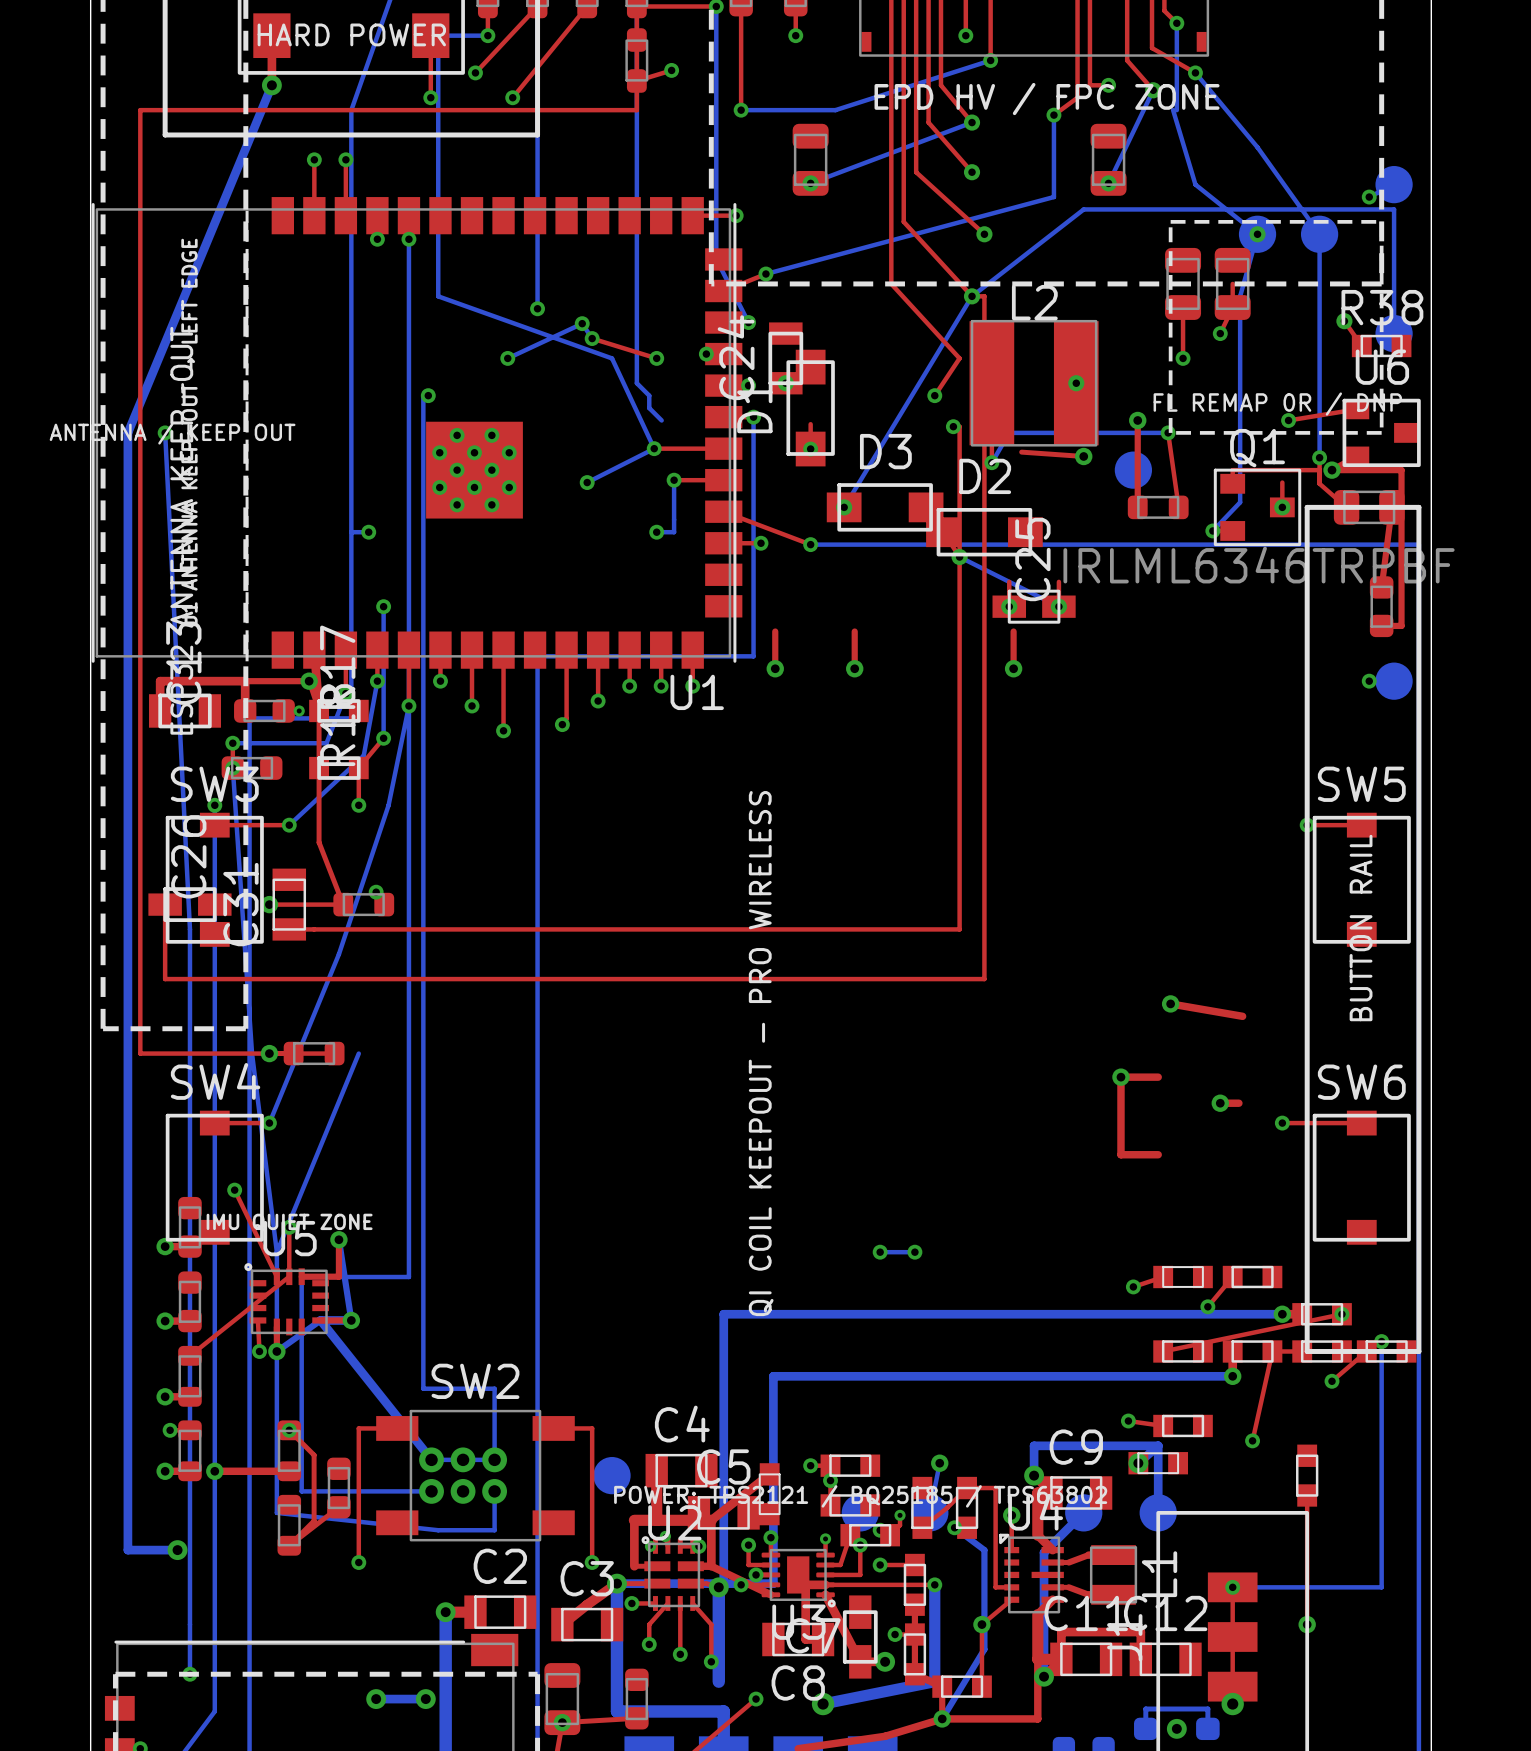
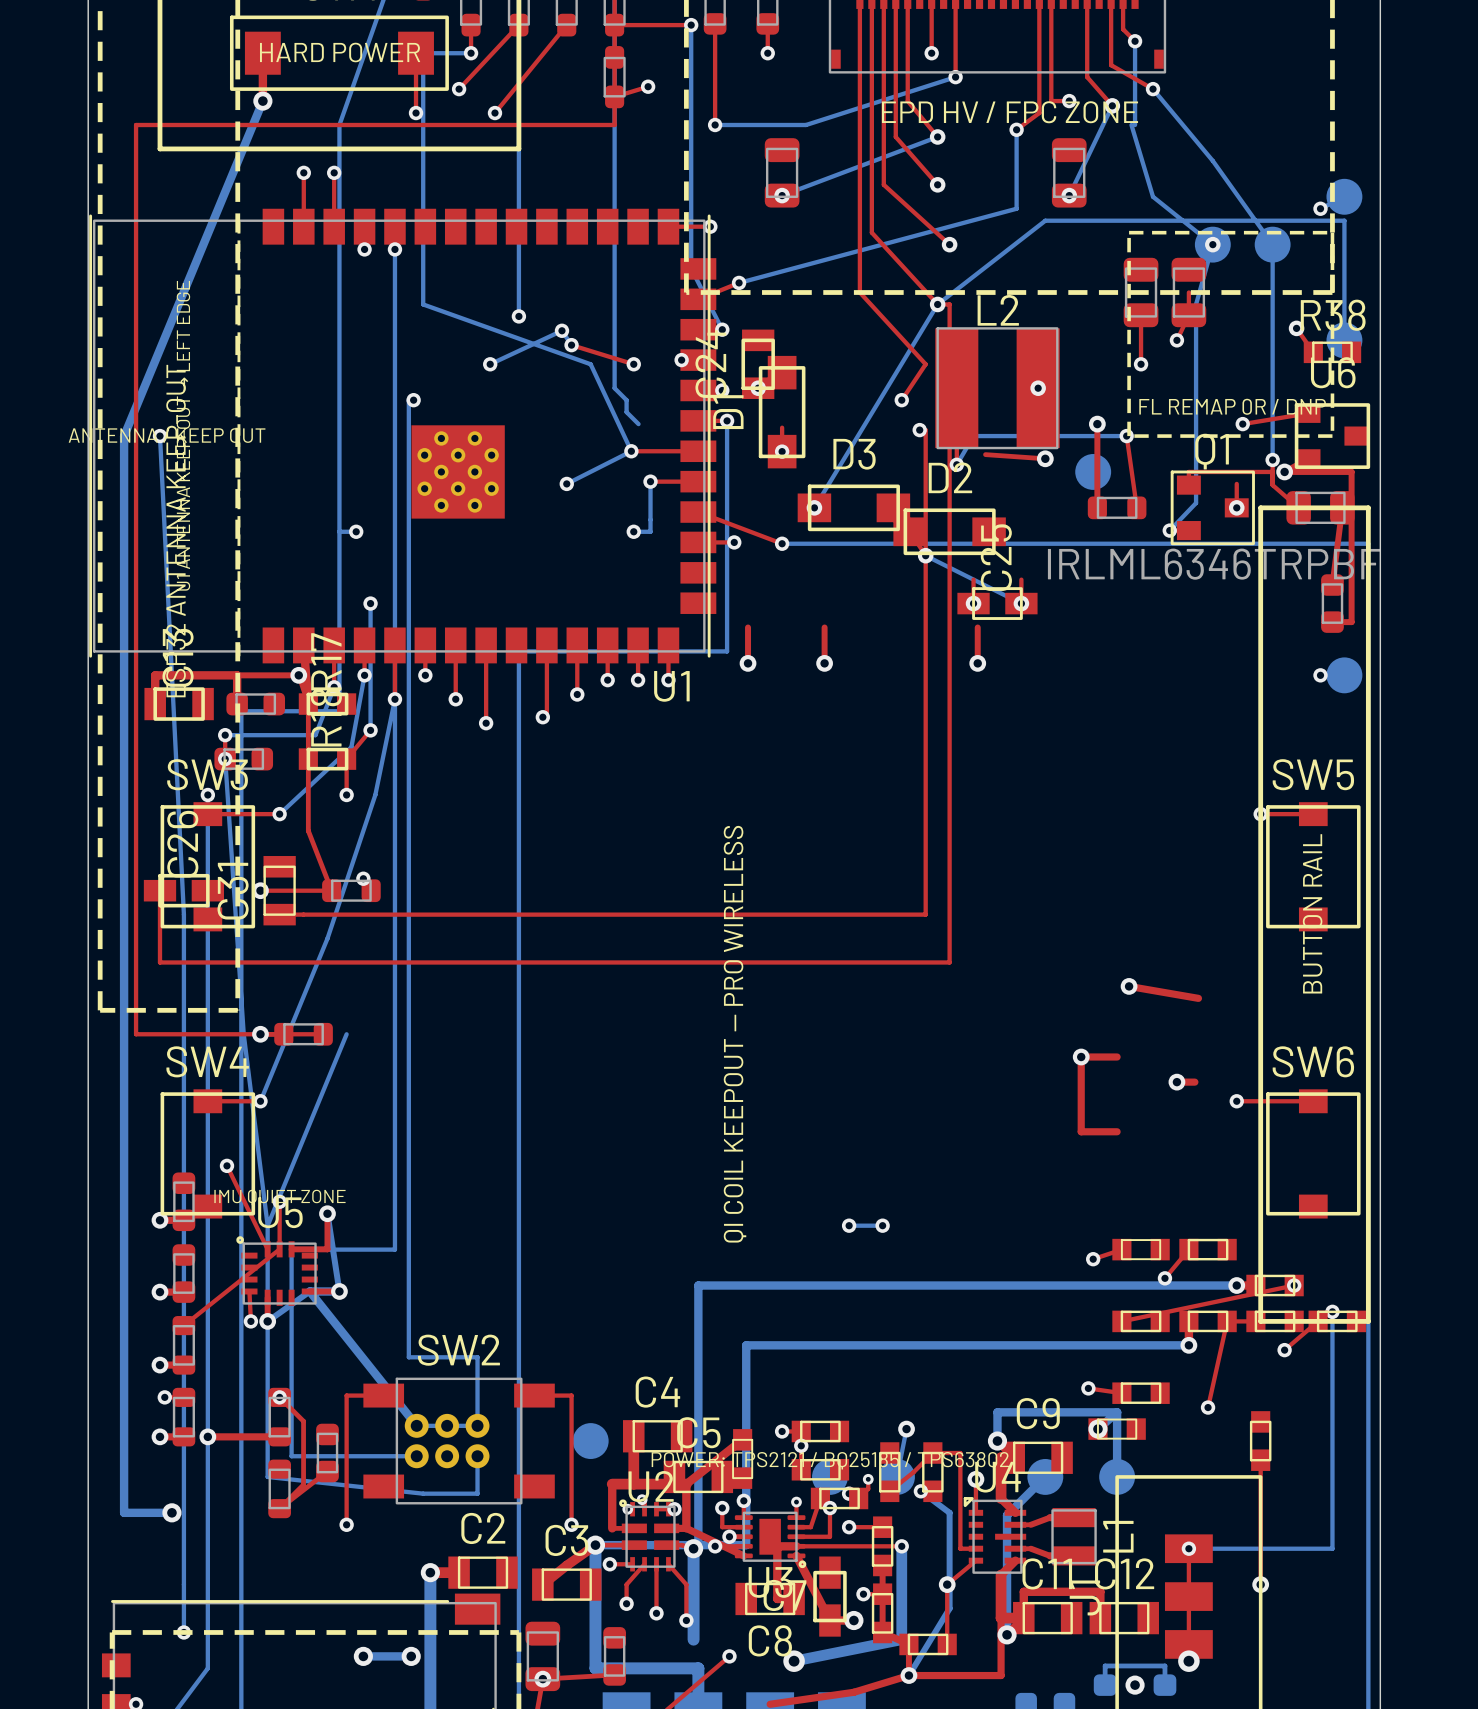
via: (299, 710) -> none

